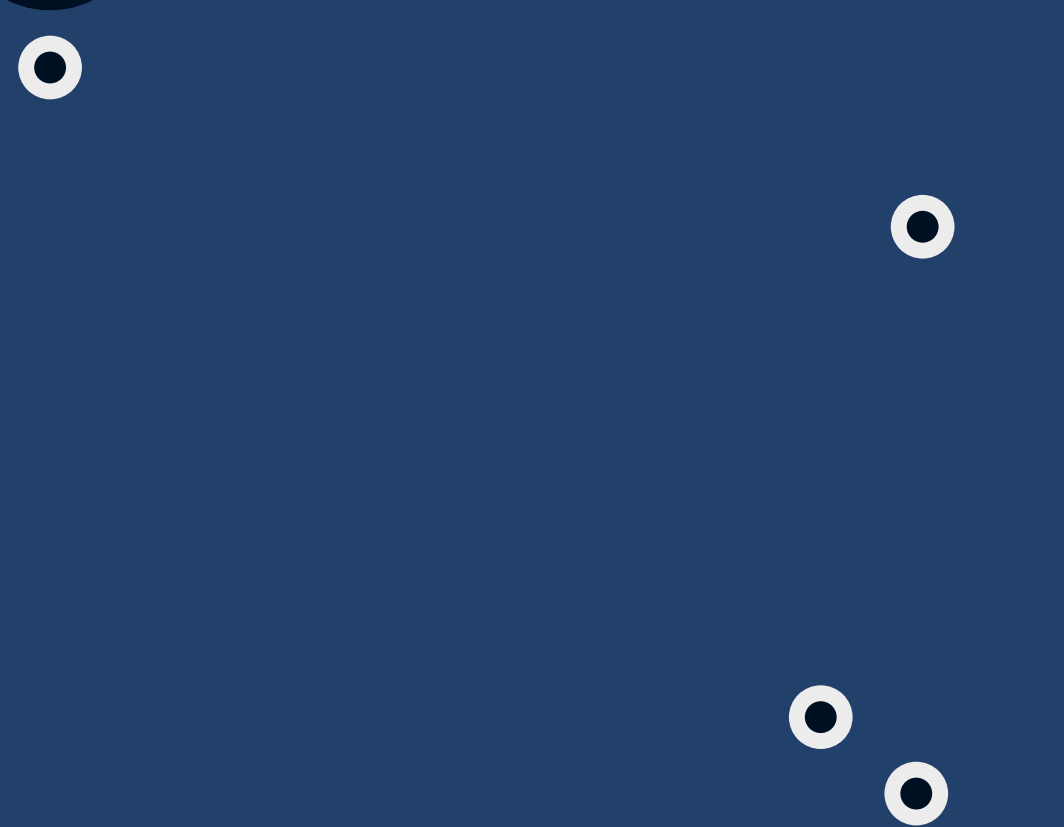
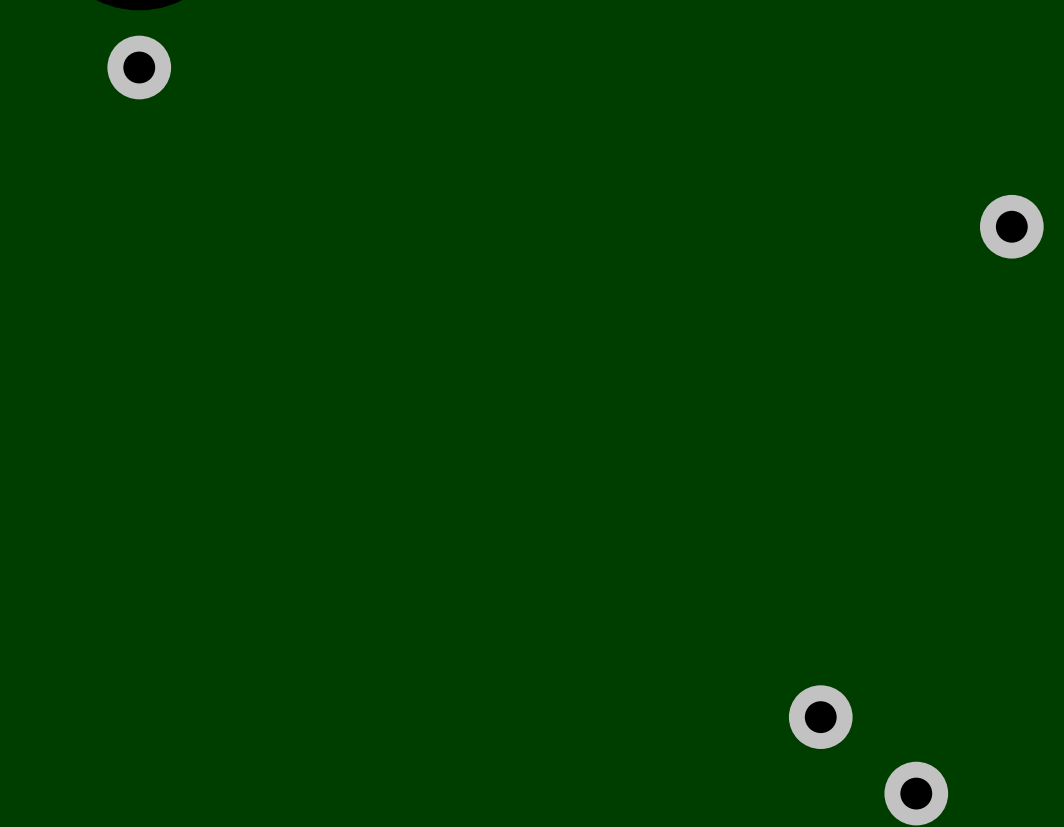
via position: (50, 67) -> (139, 67)
via position: (922, 226) -> (1011, 226)

